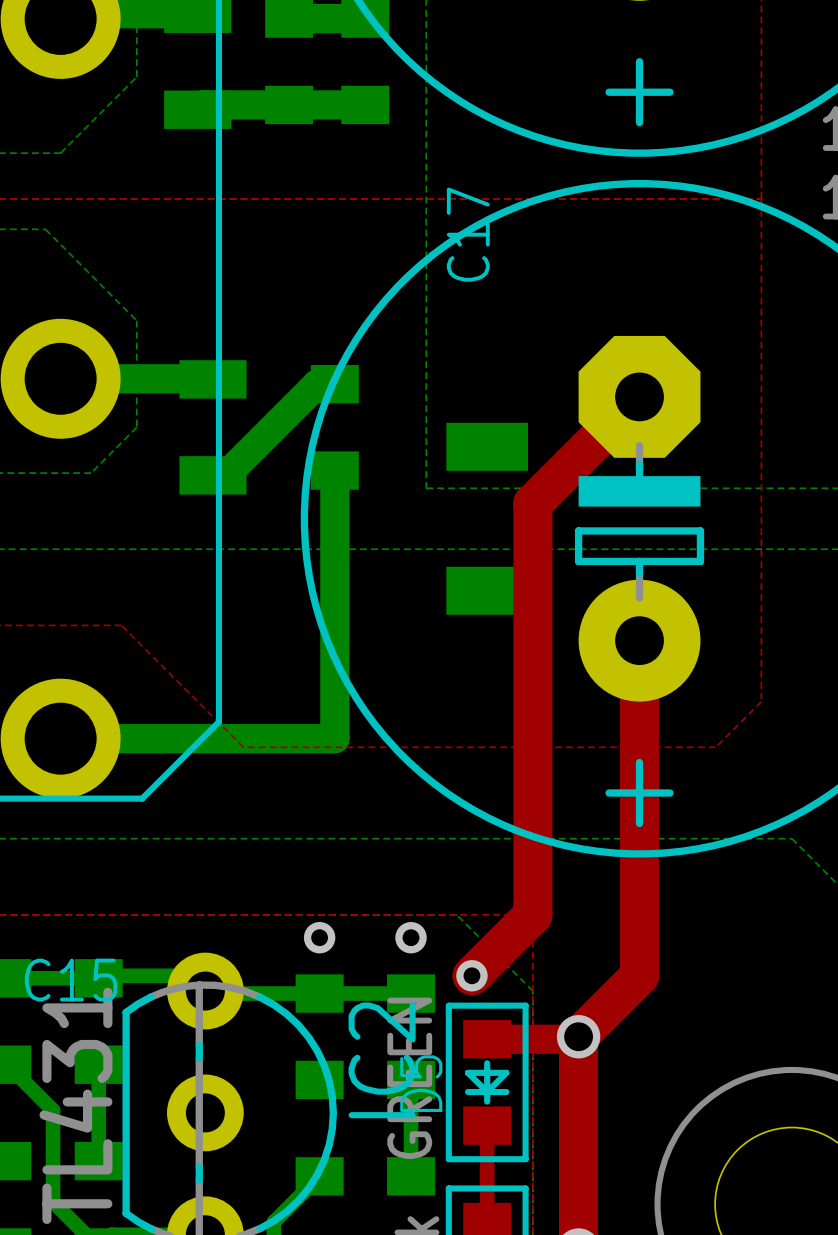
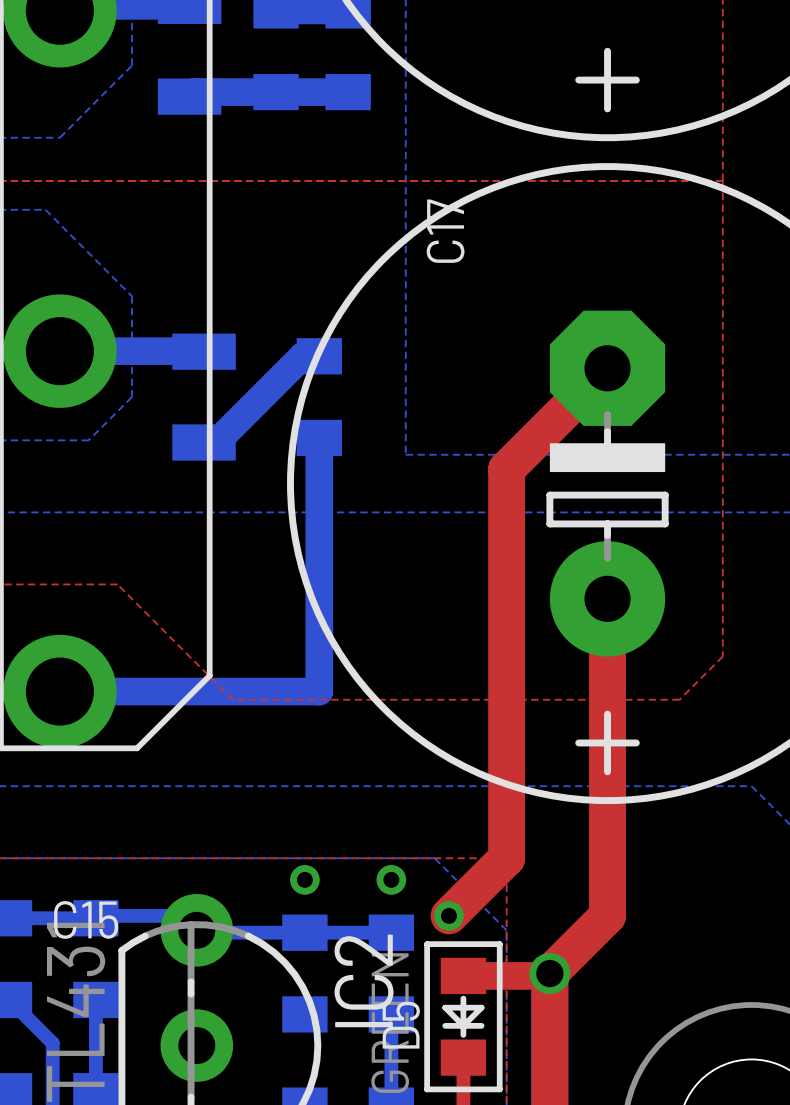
part: (487, 518) -> none

